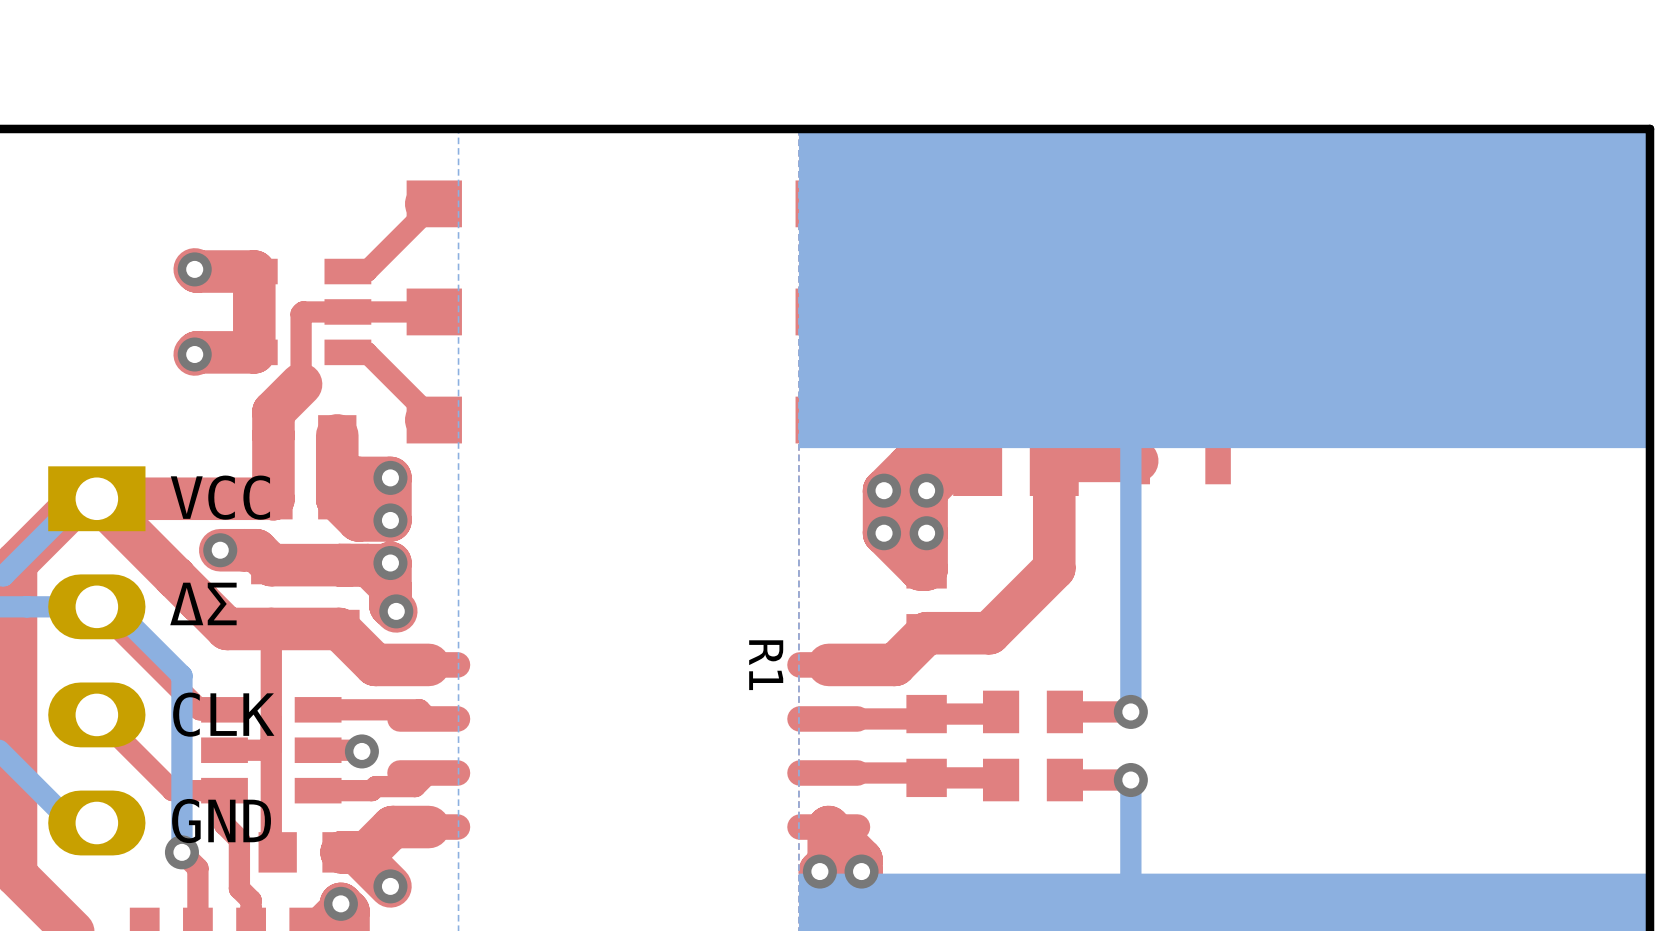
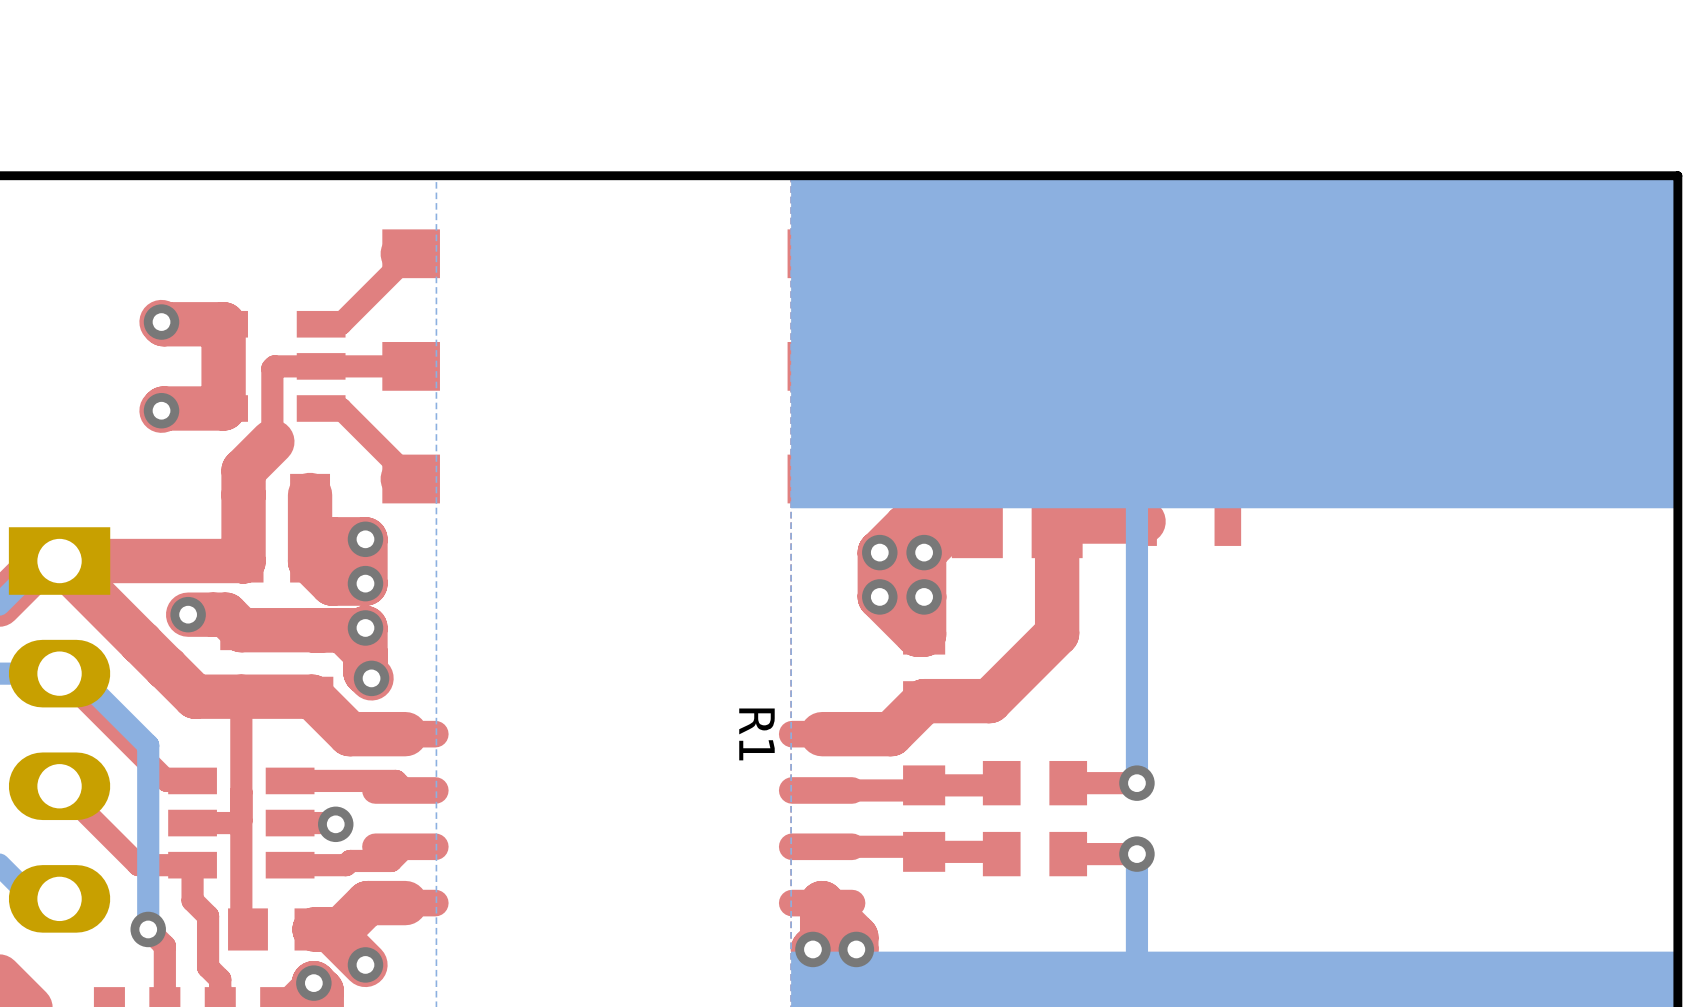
text: VCC (220, 497) -> none
text: ΔΣ (203, 603) -> none
text: CLK (223, 714) -> none
text: GND (221, 821) -> none

